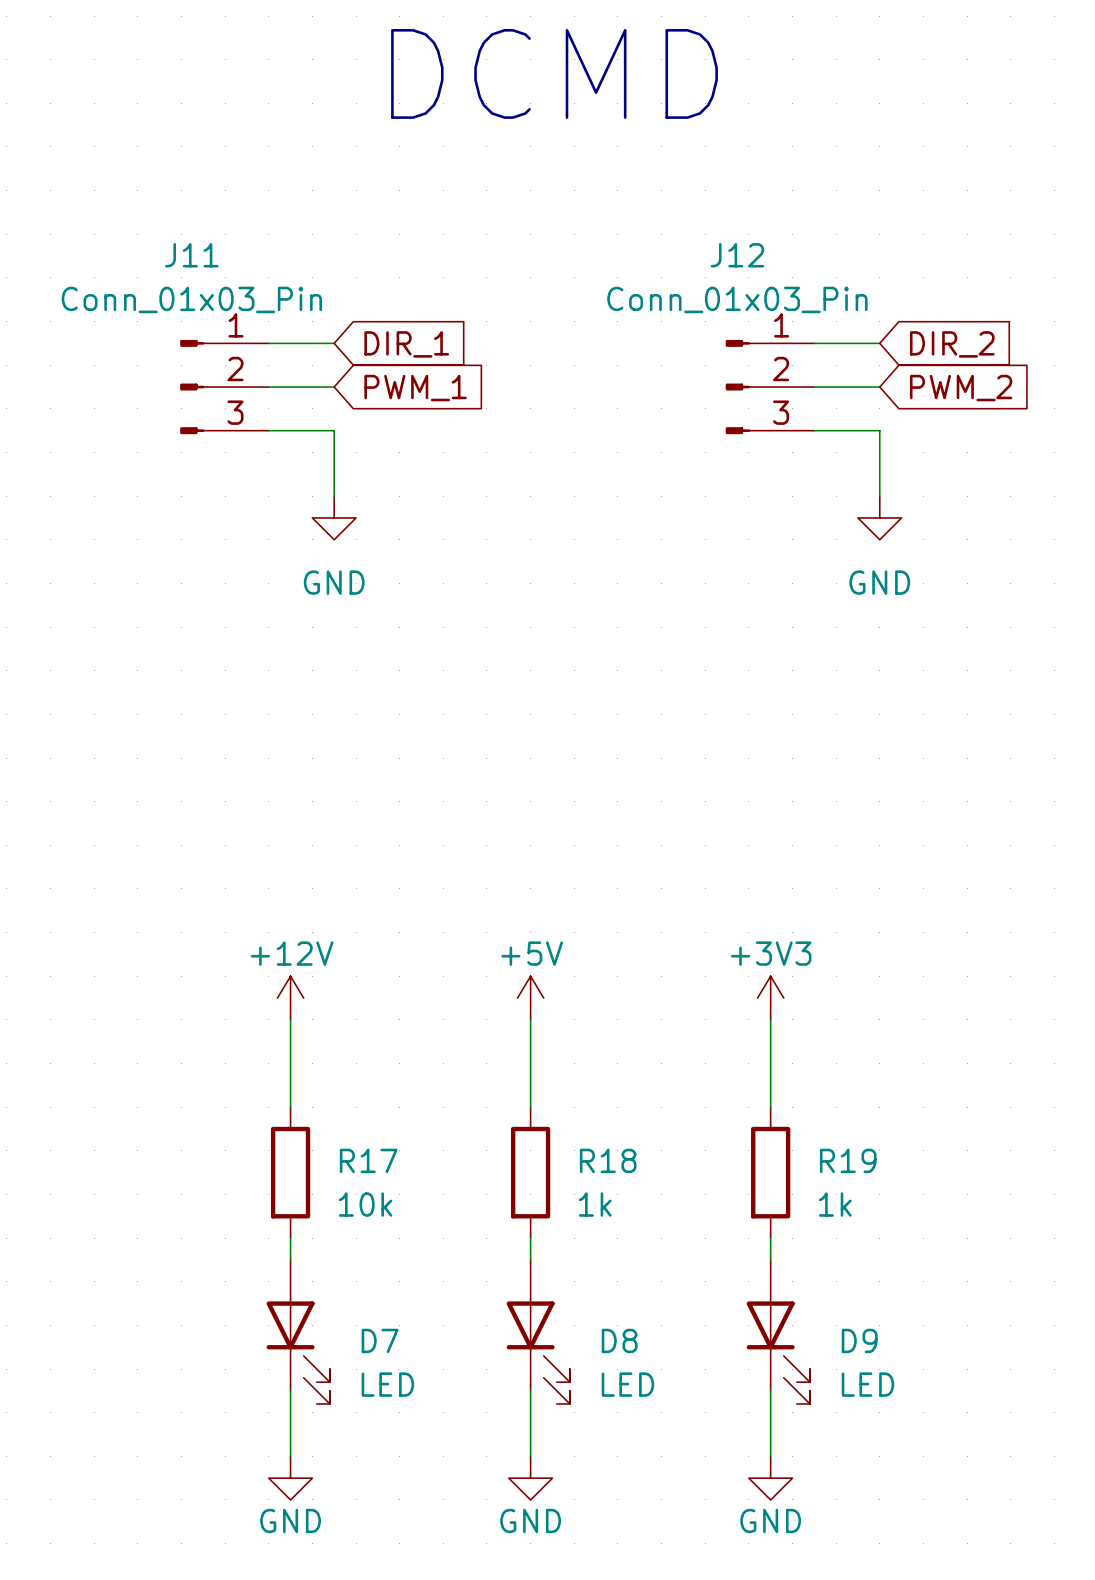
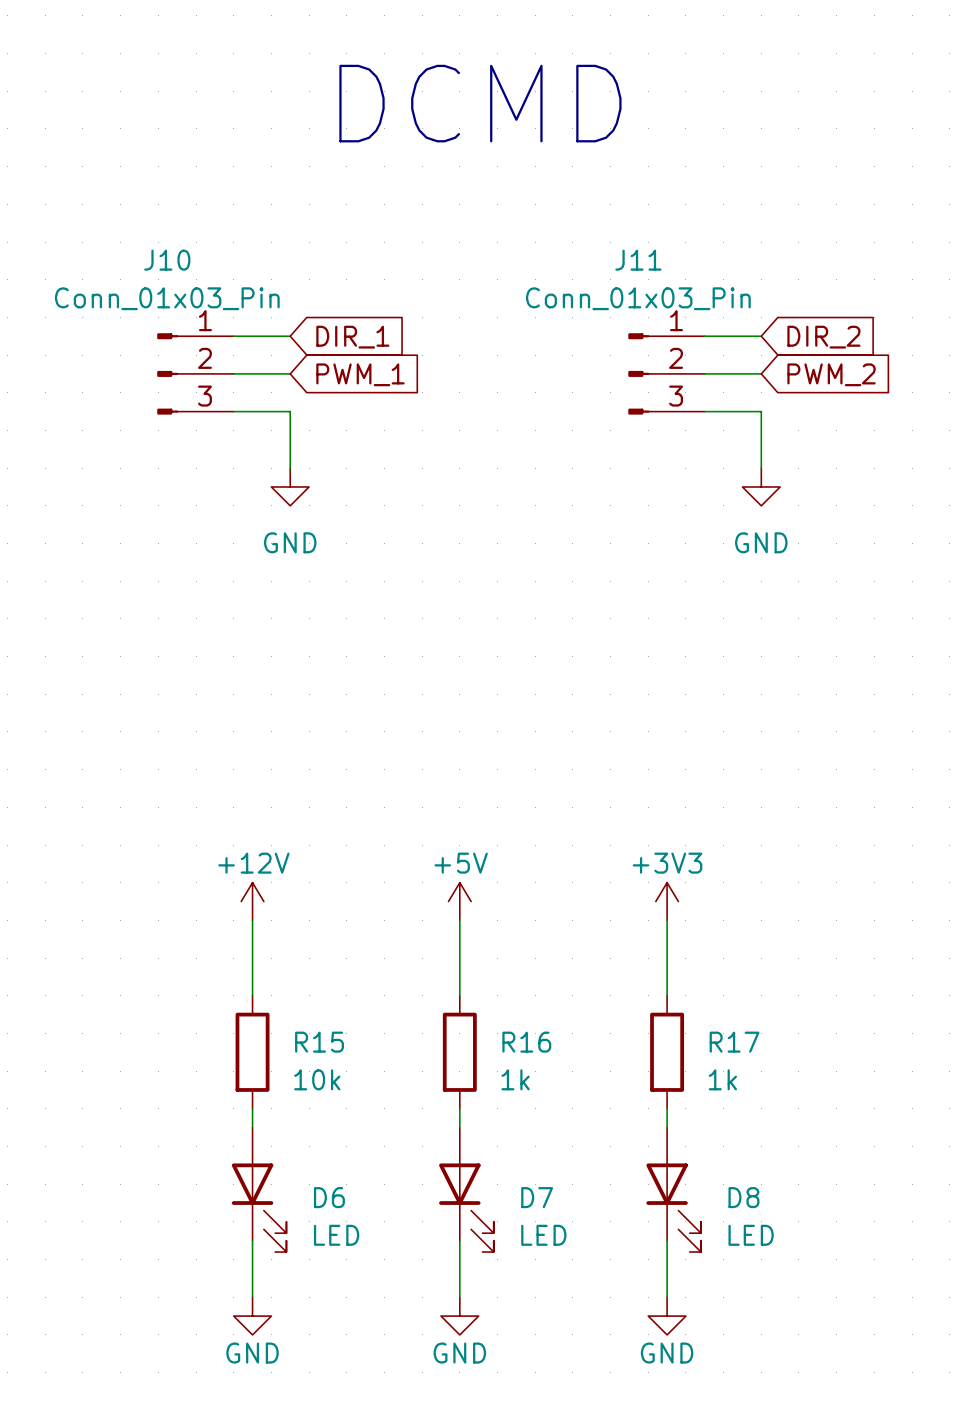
J11 name: J11 (191, 255) -> J10 (167, 260)
J12 name: J12 (737, 255) -> J11 (638, 260)
R17 name: R17 (368, 1160) -> R15 (319, 1042)
R18 name: R18 (608, 1160) -> R16 (526, 1042)
R19 name: R19 (848, 1160) -> R17 (734, 1042)
D7 name: D7 (380, 1340) -> D6 (329, 1197)
D8 name: D8 (619, 1340) -> D7 (537, 1197)
D9 name: D9 (859, 1340) -> D8 (743, 1197)

